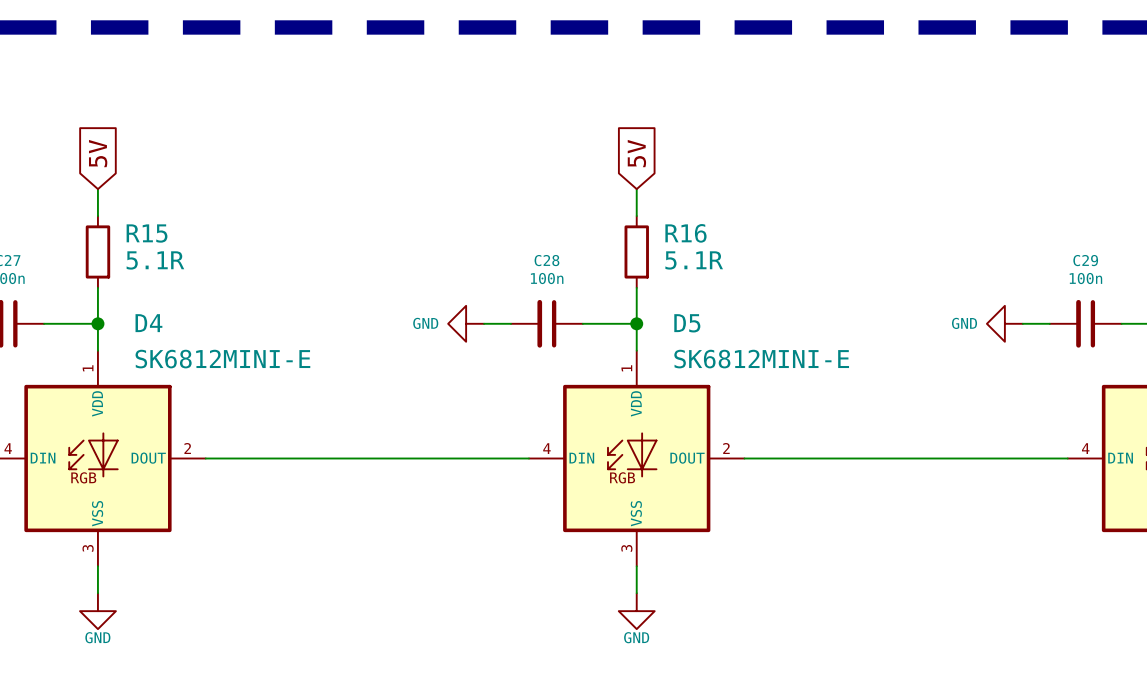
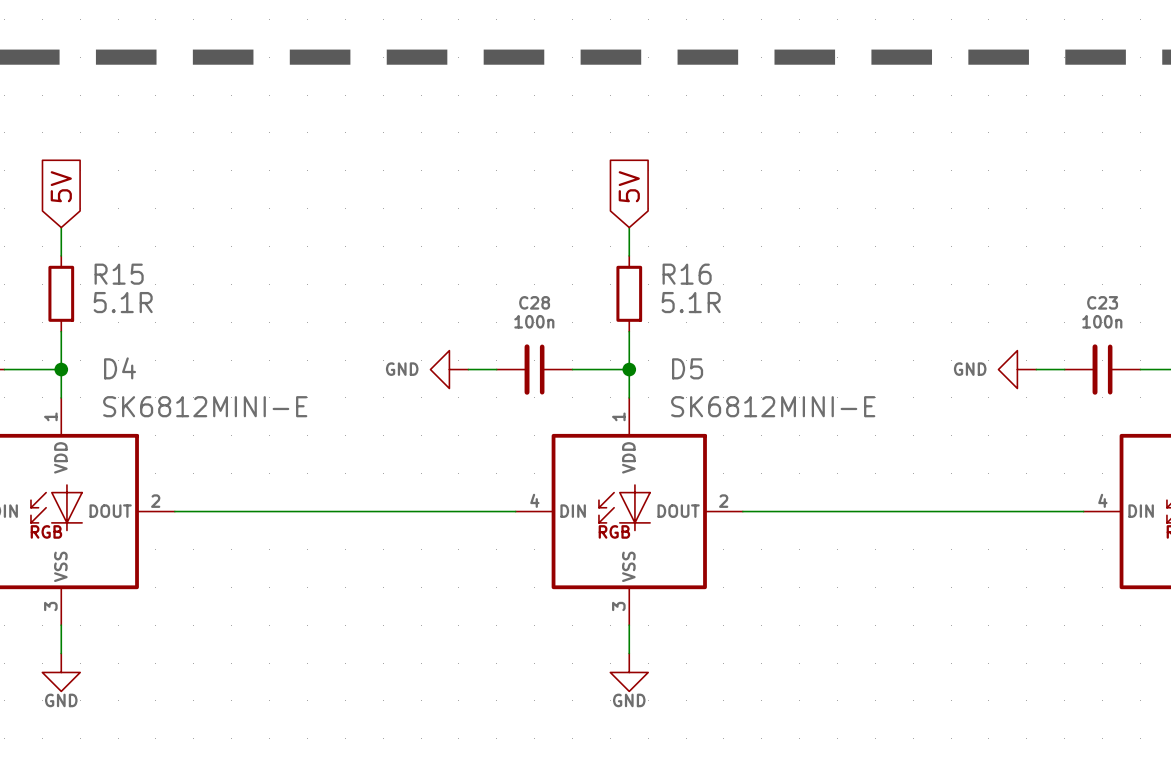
C29 name: C29 (1085, 260) -> C23 (1102, 302)

